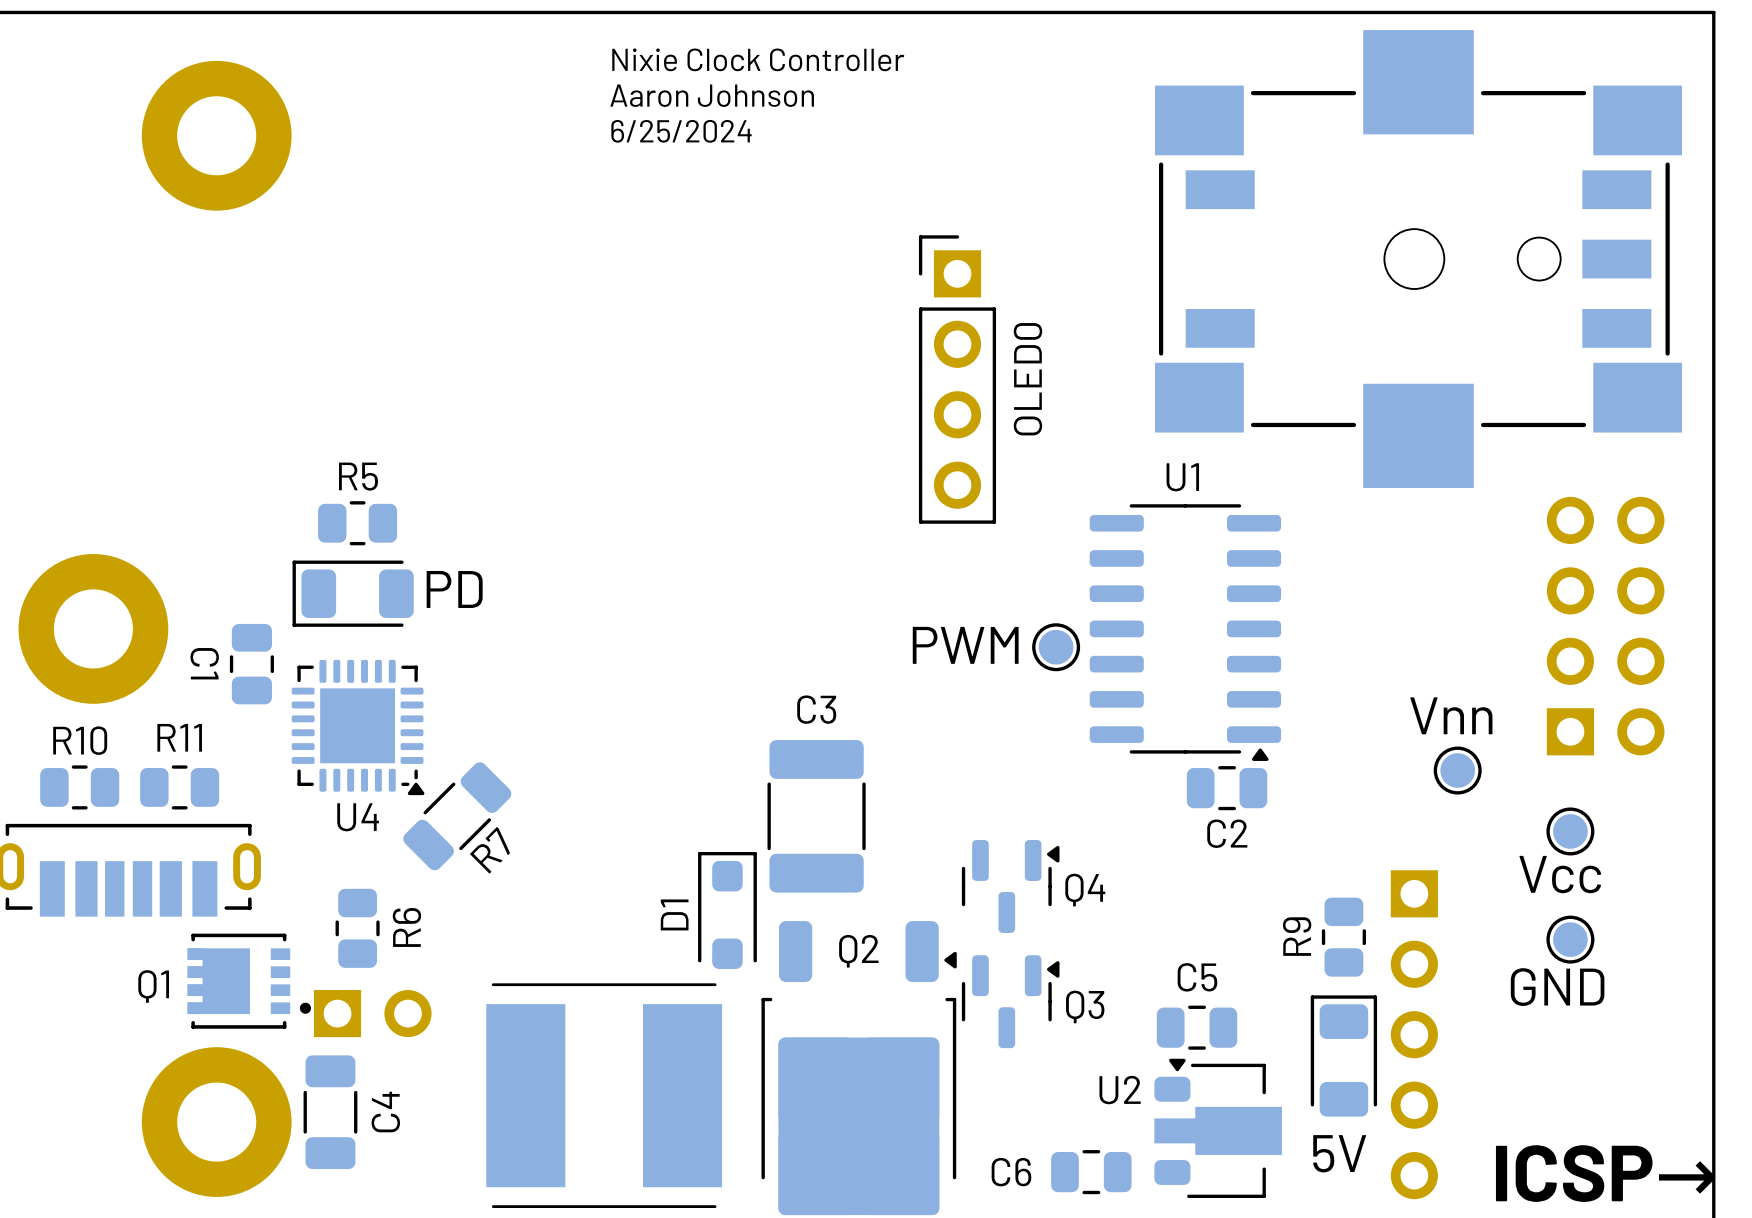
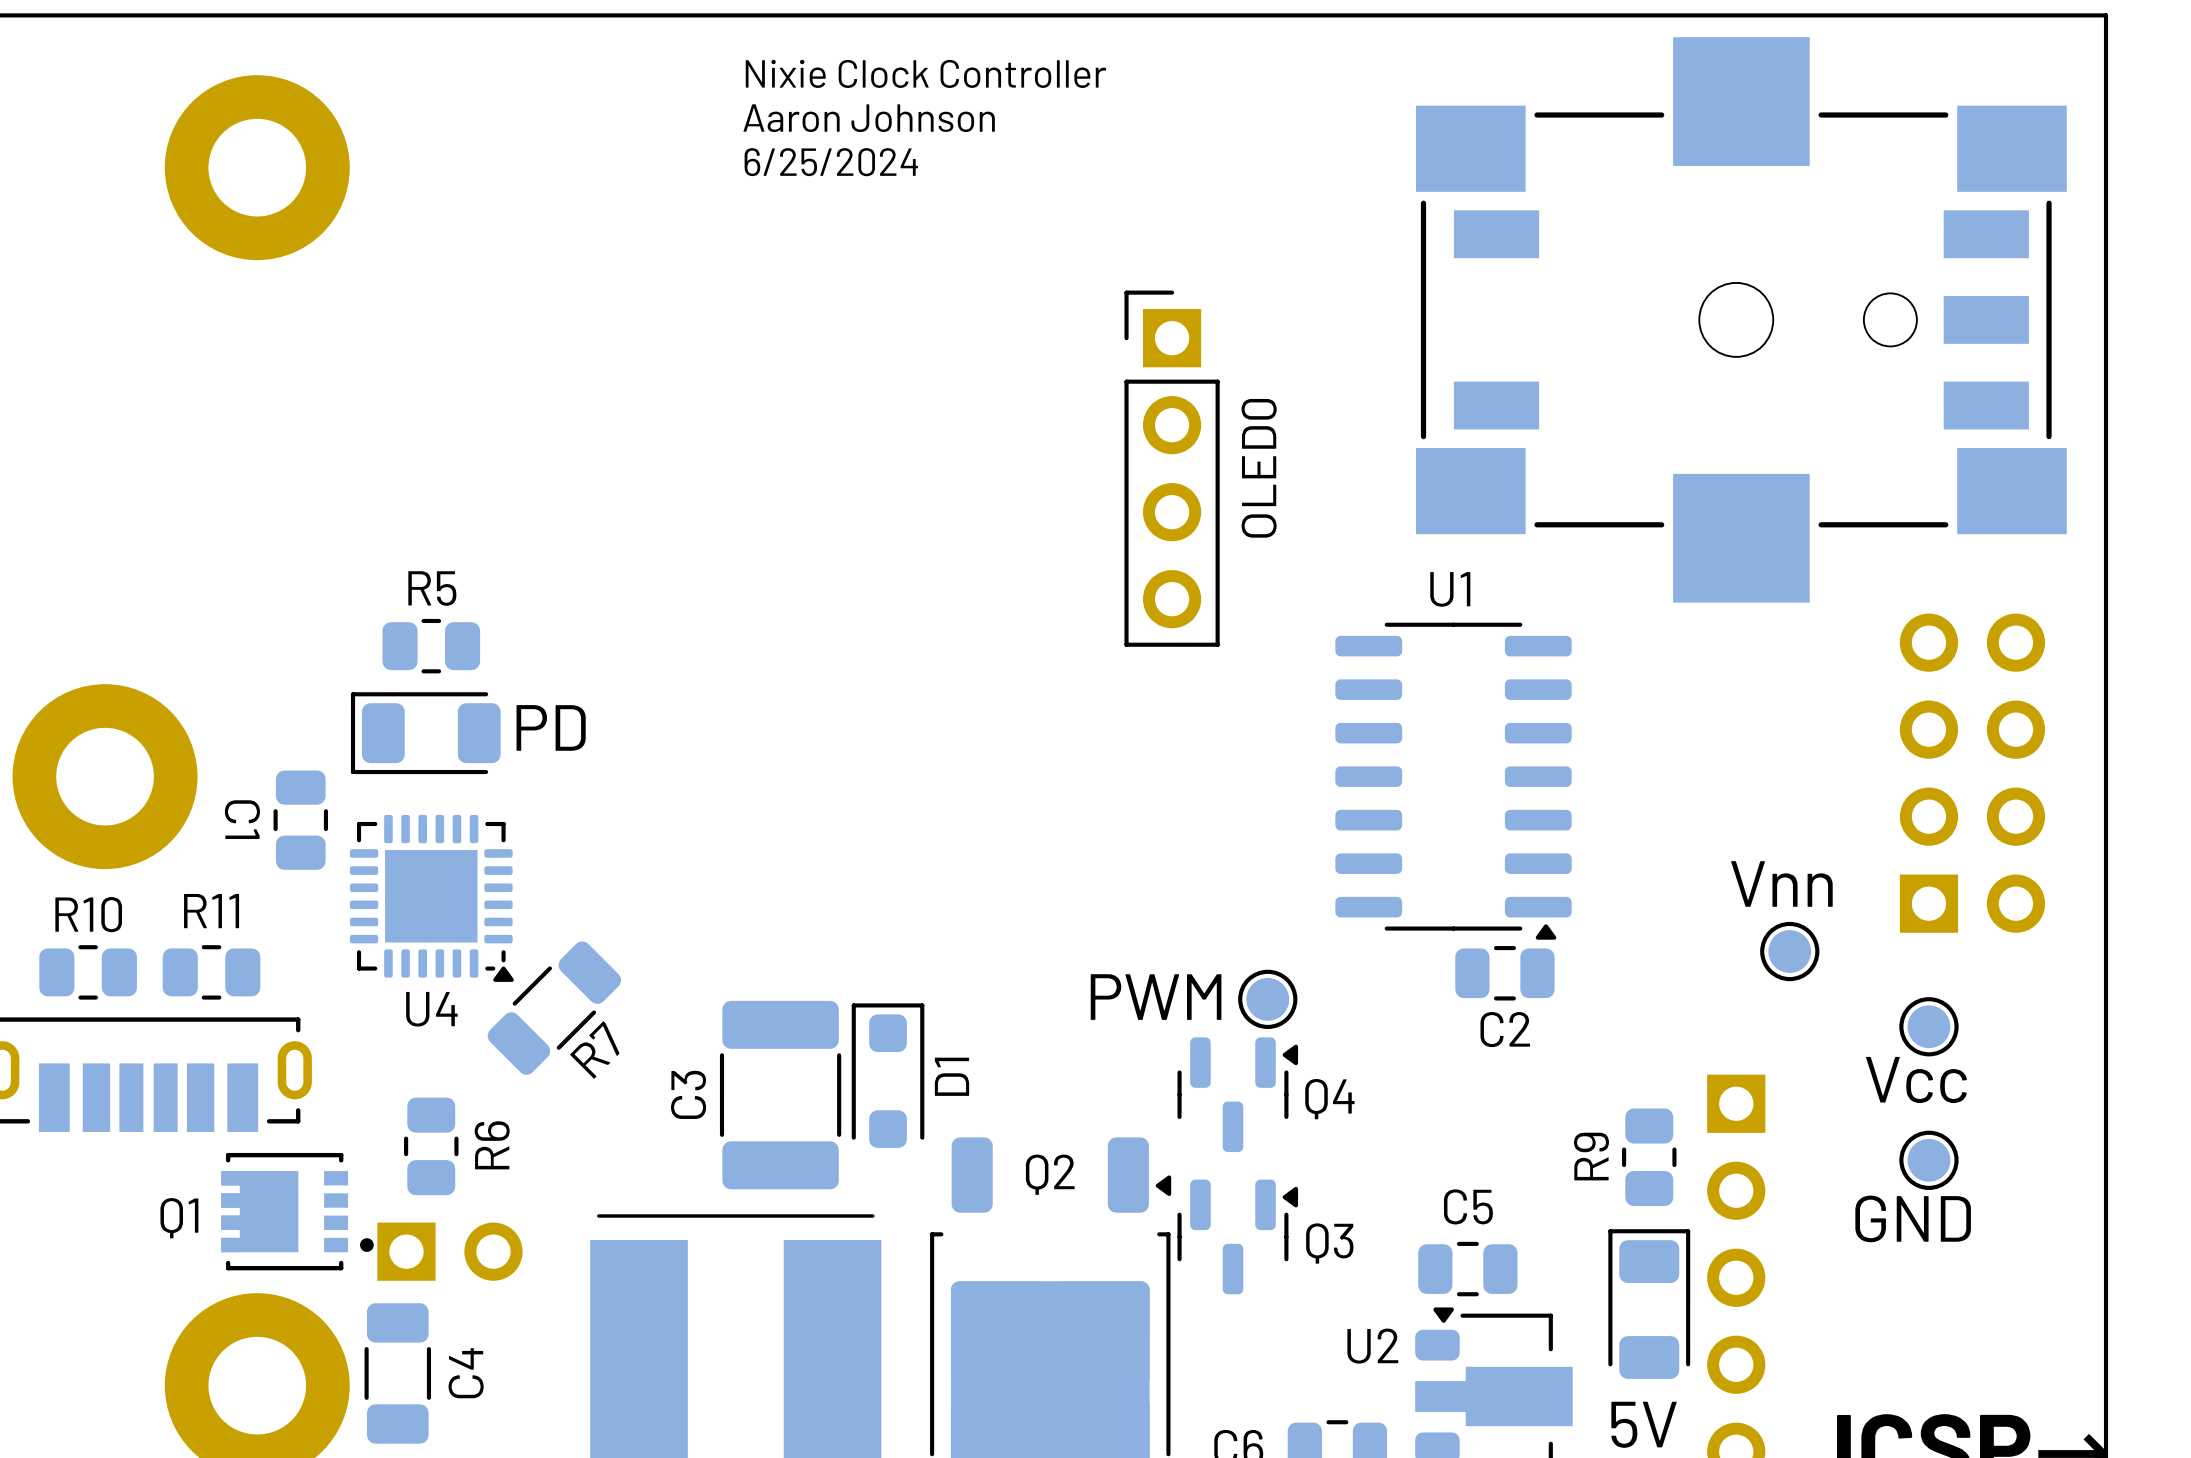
text position: PWM (965, 645) -> PWM (1156, 997)
part position: (1056, 647) -> (1267, 999)
C3 name rotation: 0° (816, 709) -> 90° counterclockwise (688, 1094)
C3 name position: C3 (816, 709) -> C3 (688, 1094)
C3 position: (816, 816) -> (780, 1095)
D1 position: (727, 910) -> (888, 1075)
D1 name position: D1 (674, 914) -> D1 (951, 1076)

